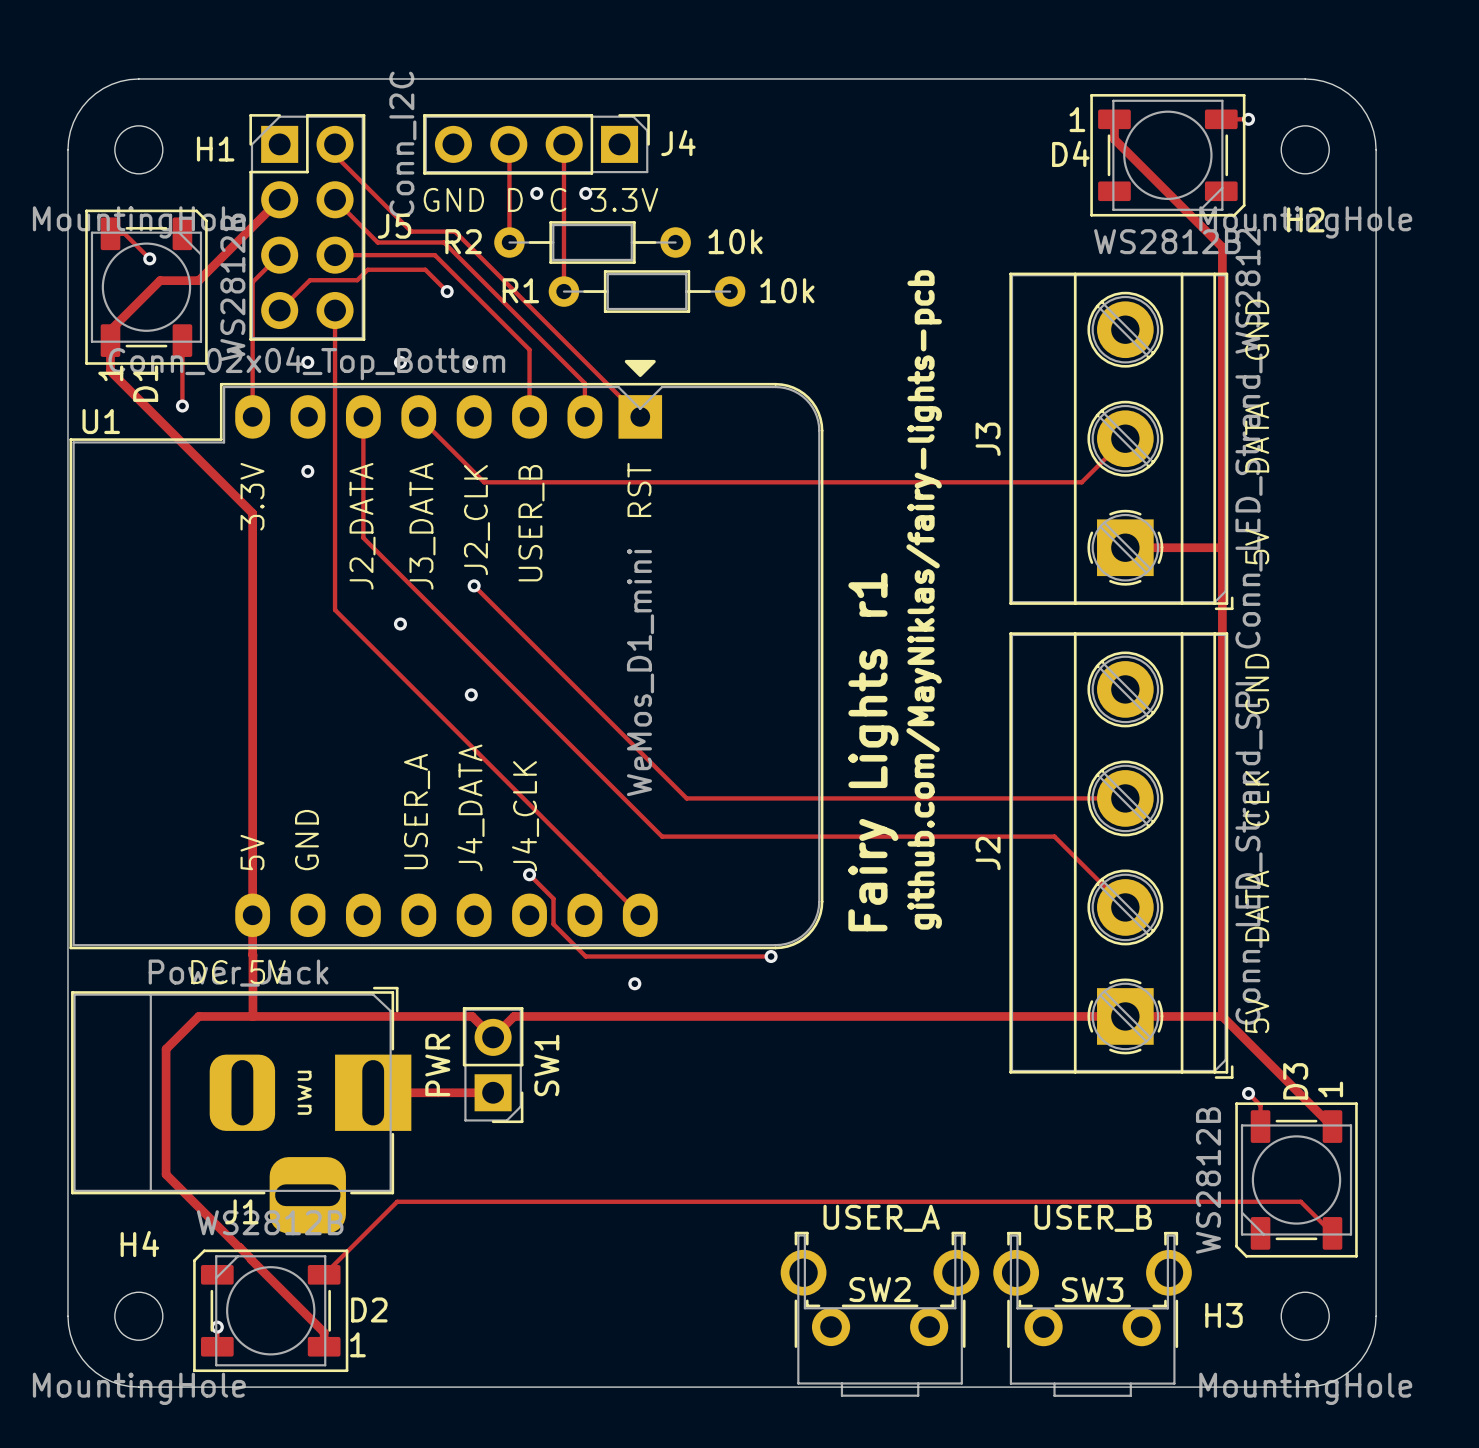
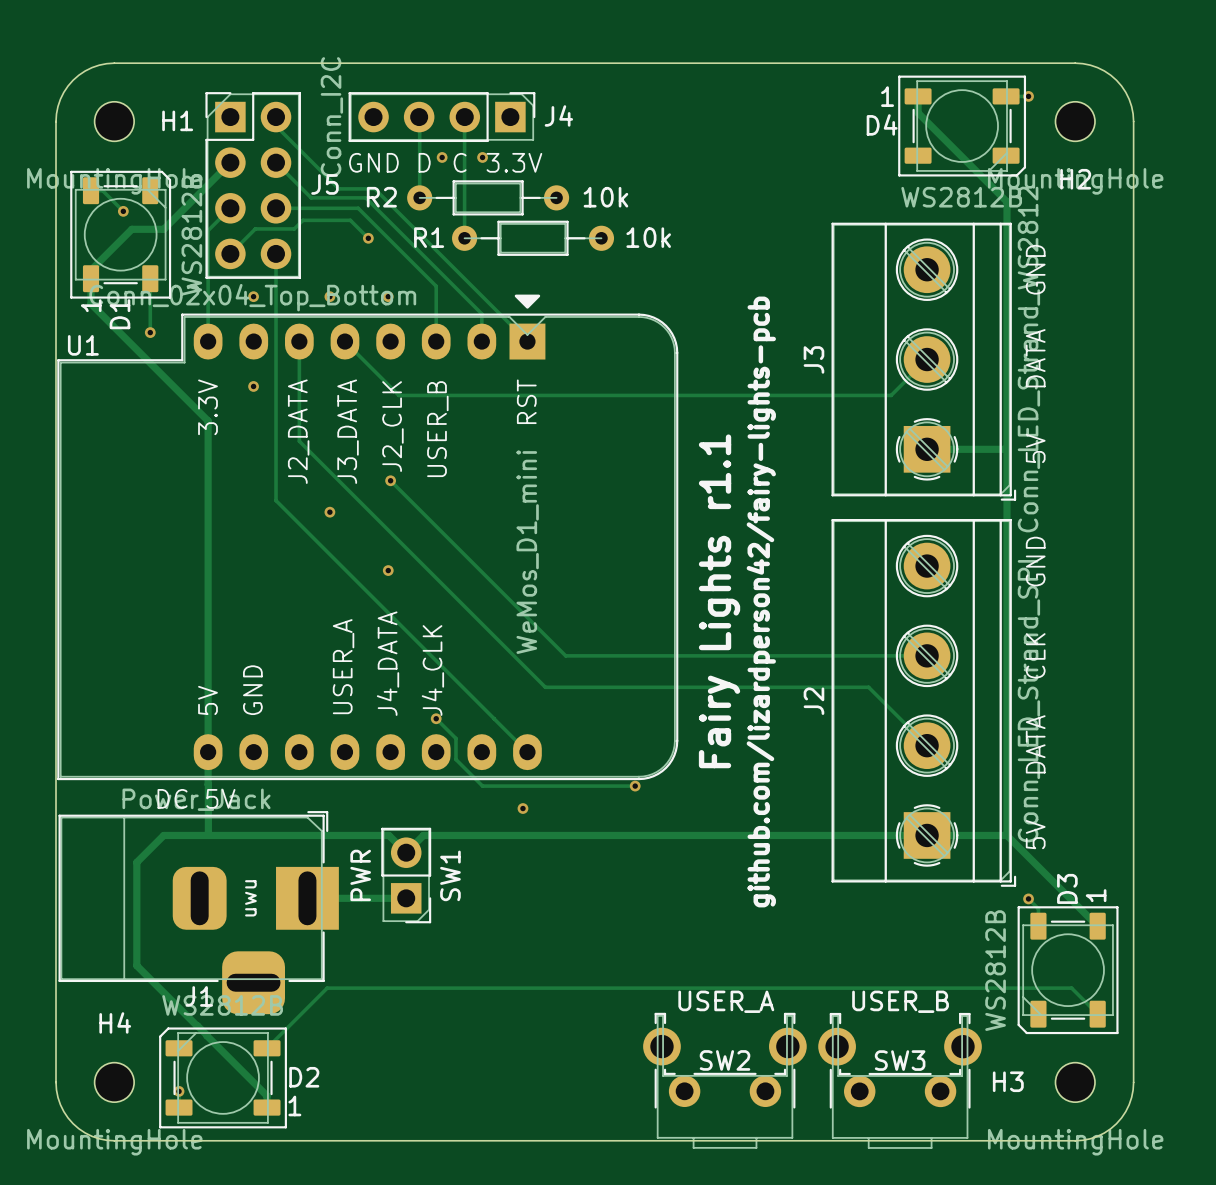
text: github.com/MayNiklas/fairy-lights-pcb (924, 599) -> github.com/lizardperson42/fairy-lights-pcb (761, 601)
text: Fairy Lights r1 (873, 752) -> Fairy Lights r1.1 (719, 601)

